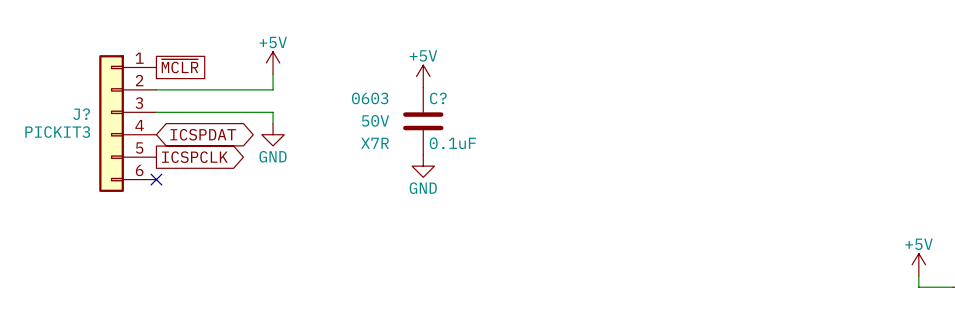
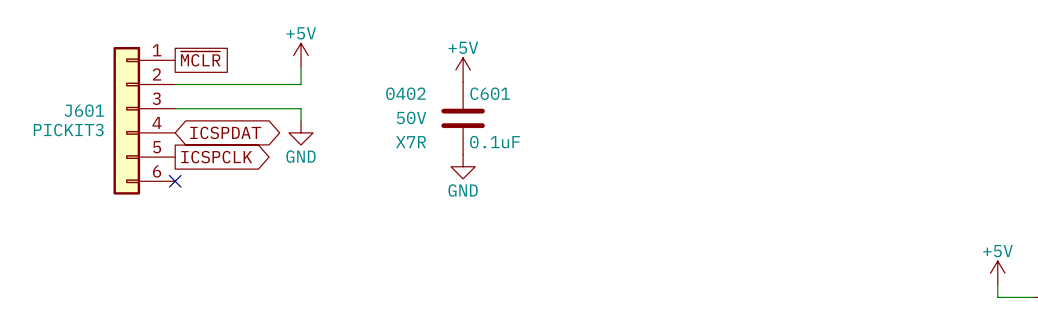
C? text: 0603 (370, 98) -> 0402 (405, 93)
C? name: C? (438, 98) -> C601 (490, 93)
J? name: J? (81, 114) -> J601 (84, 110)

